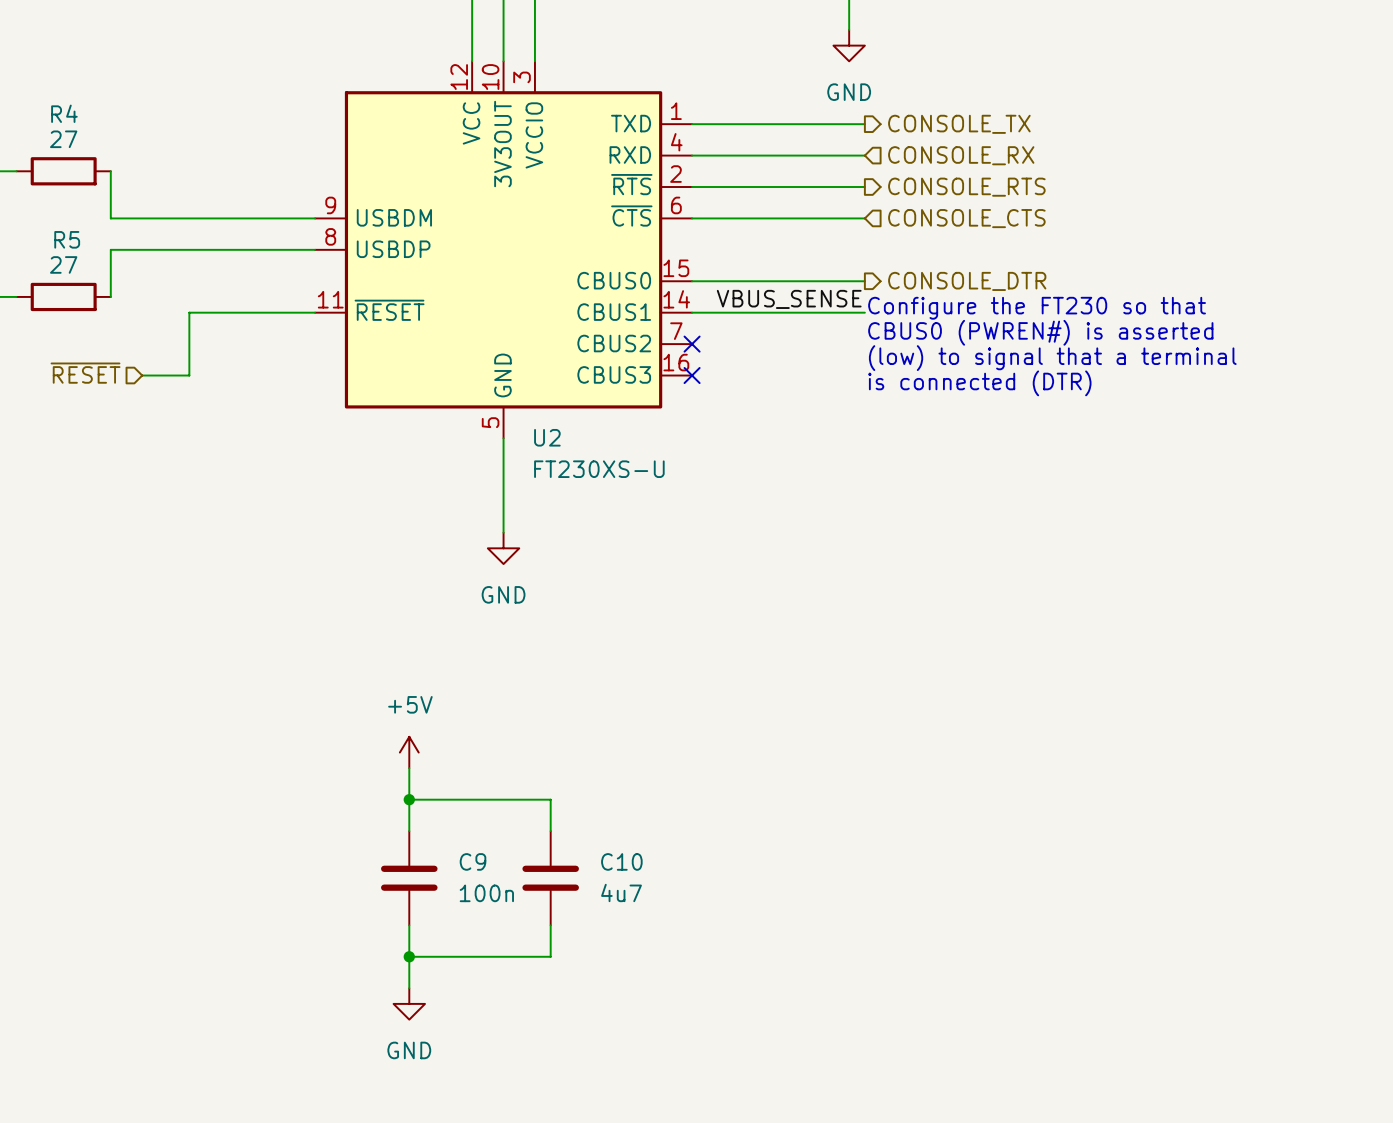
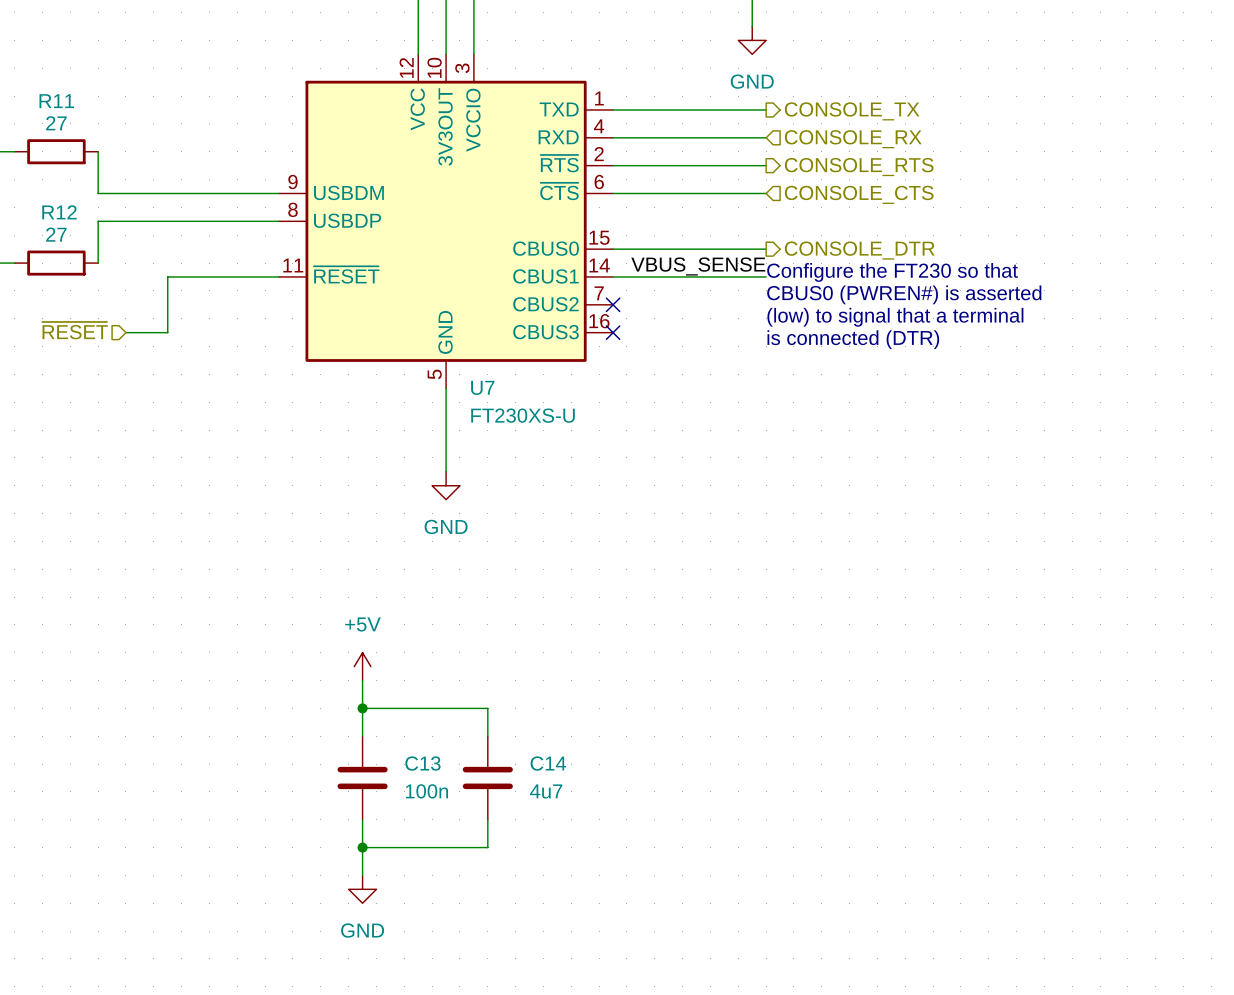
R4 name: R4 (64, 113) -> R11 (56, 101)
R5 name: R5 (67, 239) -> R12 (59, 212)
U2 name: U2 (547, 437) -> U7 (482, 387)
C9 name: C9 (473, 861) -> C13 (422, 763)
C10 name: C10 (621, 861) -> C14 (548, 763)

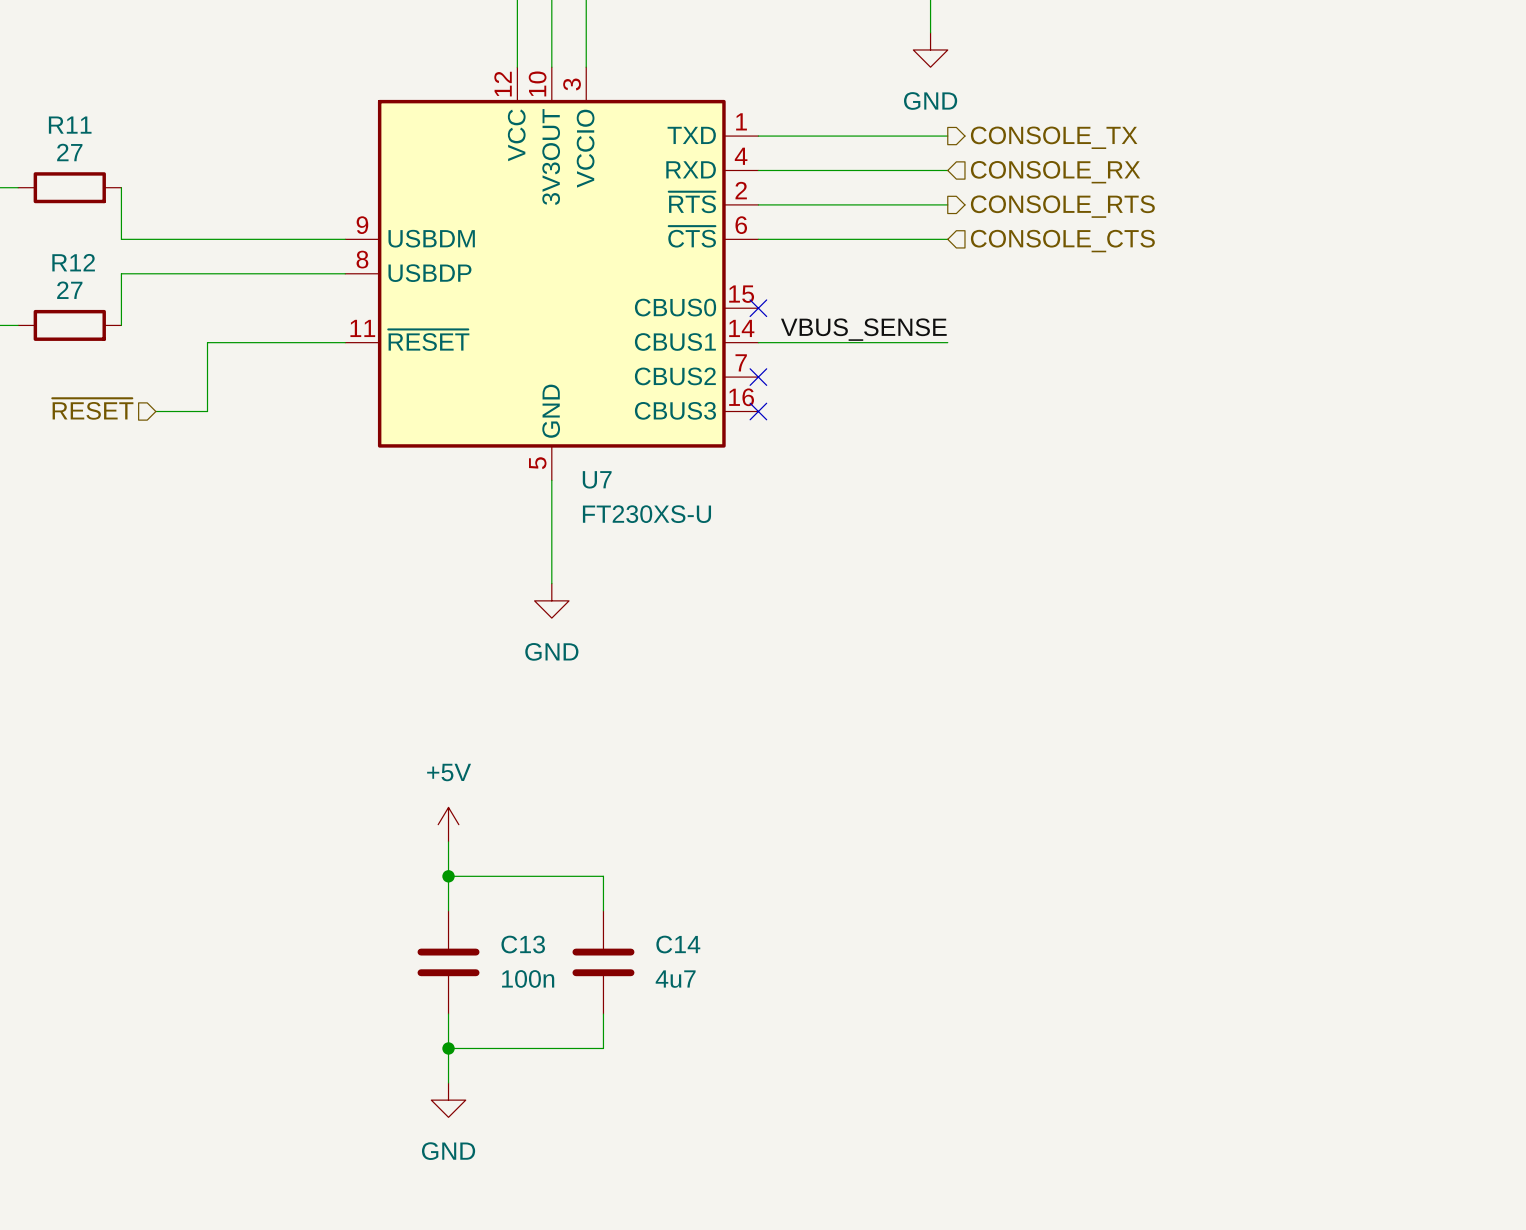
wire: (613, 249) (766, 249) -> none
no-connect mark: none -> (758, 308)
hierarchical label: CONSOLE_DTR (859, 250) -> none
text: Configure the FT230 so that (892, 272) -> none
text: CBUS0 (PWREN#) is asserted (904, 294) -> none
text: (low) to signal that a terminal (895, 317) -> none
text: is connected (DTR) (853, 339) -> none

